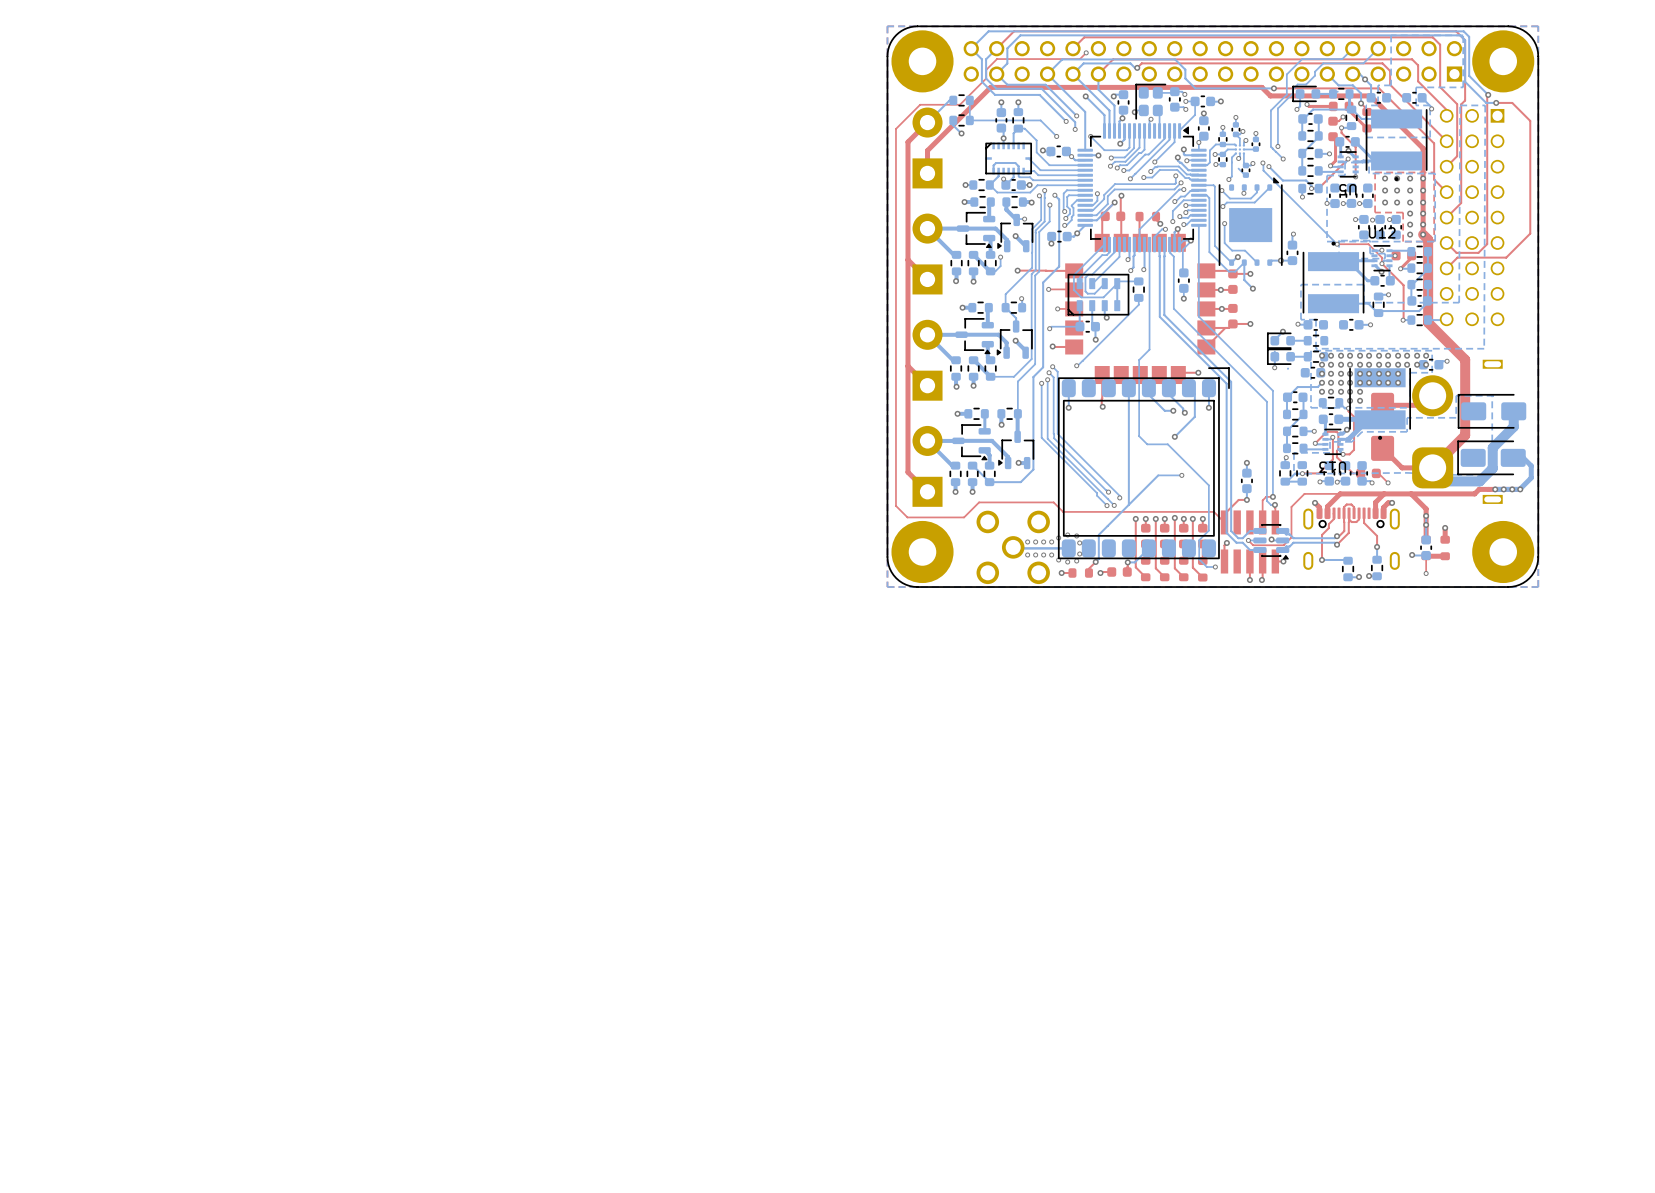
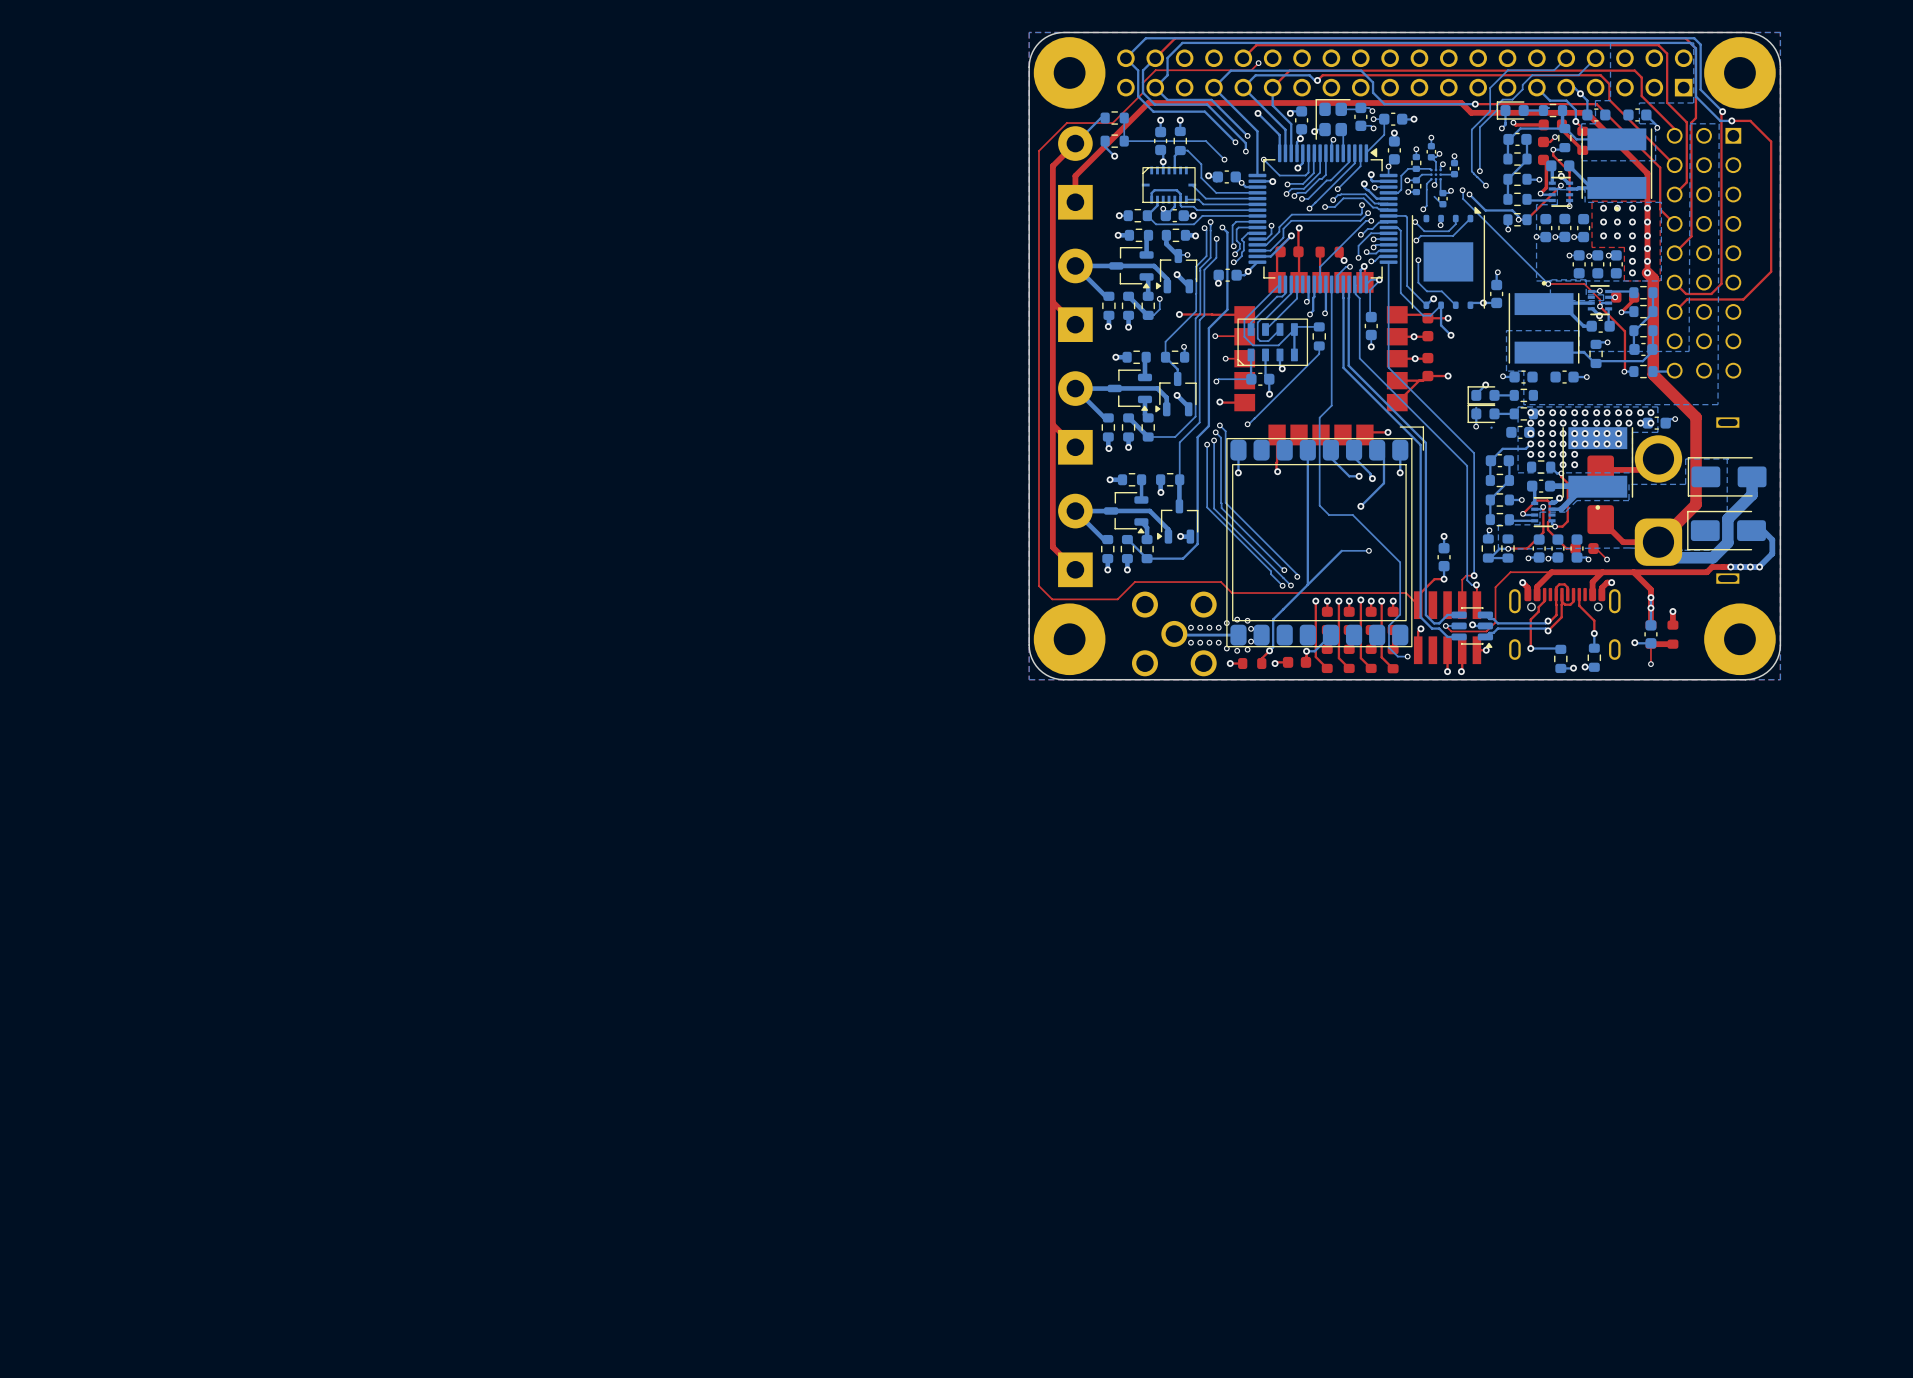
U5 name: U5 (1347, 189) -> none
U12 name: U12 (1382, 232) -> none
U13 name: U13 (1332, 467) -> none

